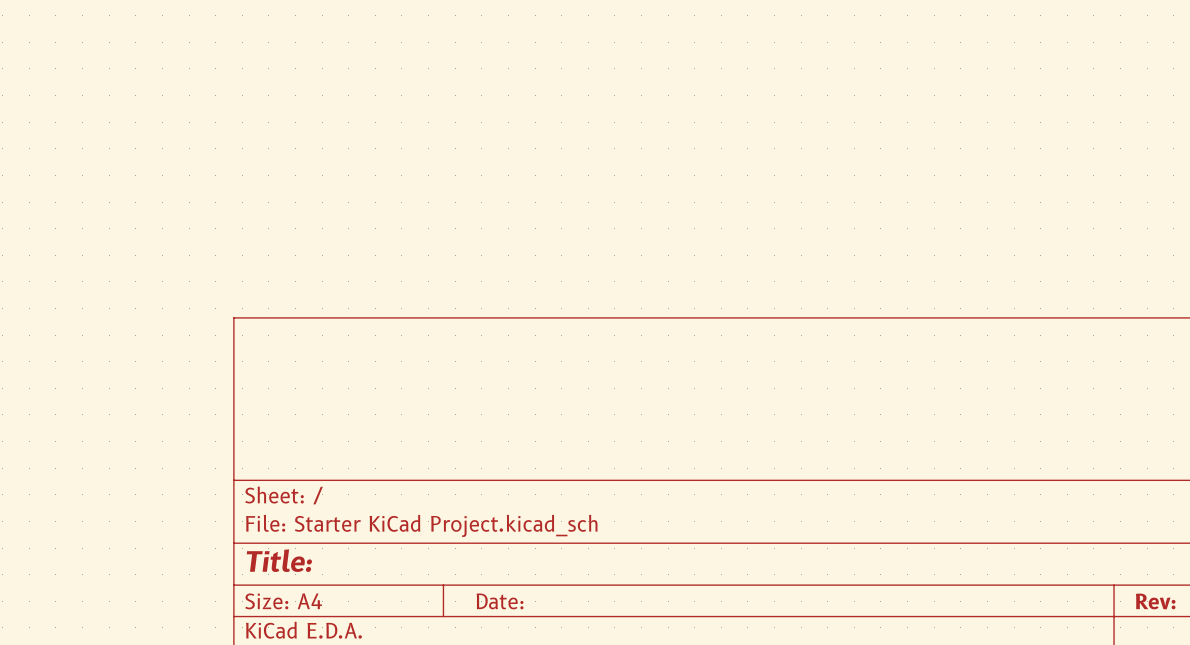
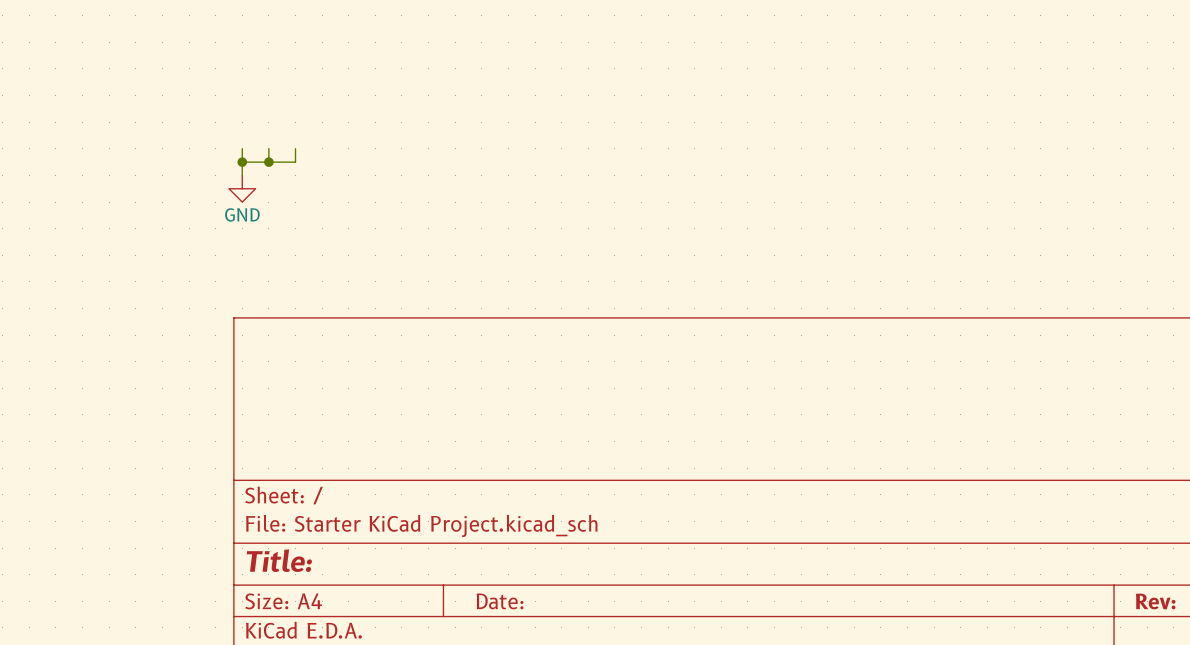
wire: none -> (242, 148) (242, 175)
wire: none -> (268, 148) (268, 162)
wire: none -> (295, 148) (295, 162) (242, 162)
junction: none -> (242, 162)
junction: none -> (268, 162)
power symbol: none -> GND (242, 188)

